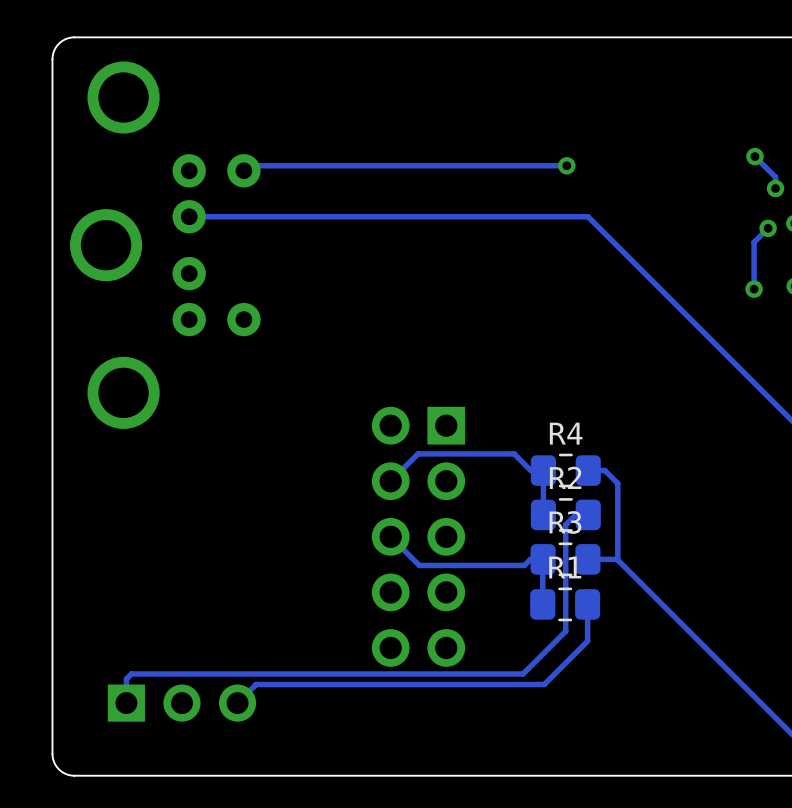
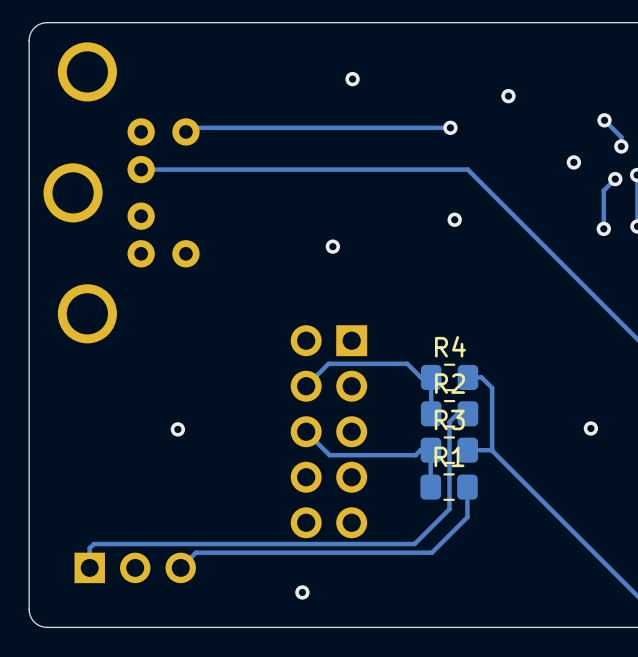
via: none -> (352, 79)
via: none -> (508, 96)
via: none -> (573, 162)
via: none -> (454, 219)
via: none -> (332, 246)
via: none -> (590, 428)
via: none -> (177, 429)
via: none -> (302, 592)

